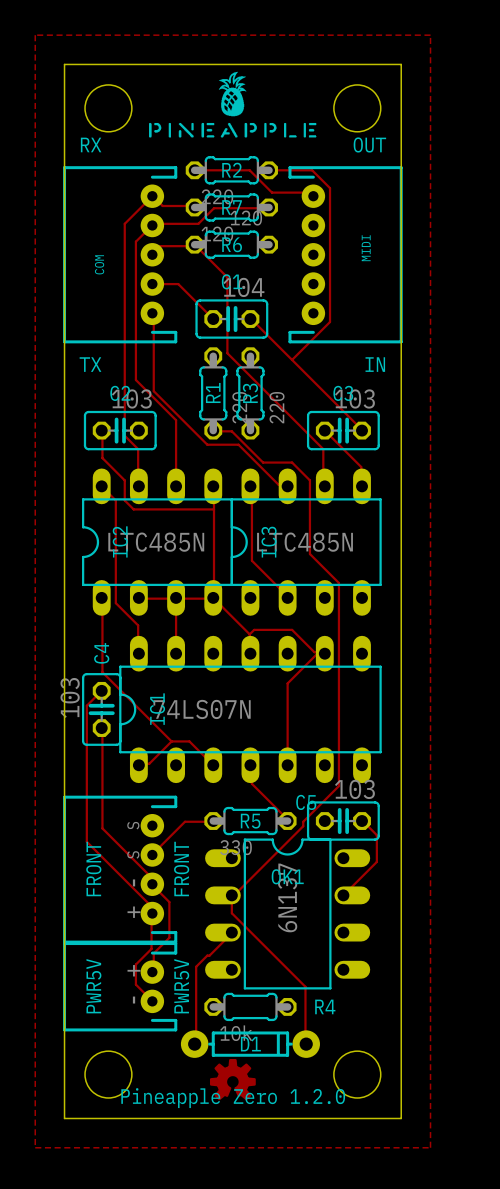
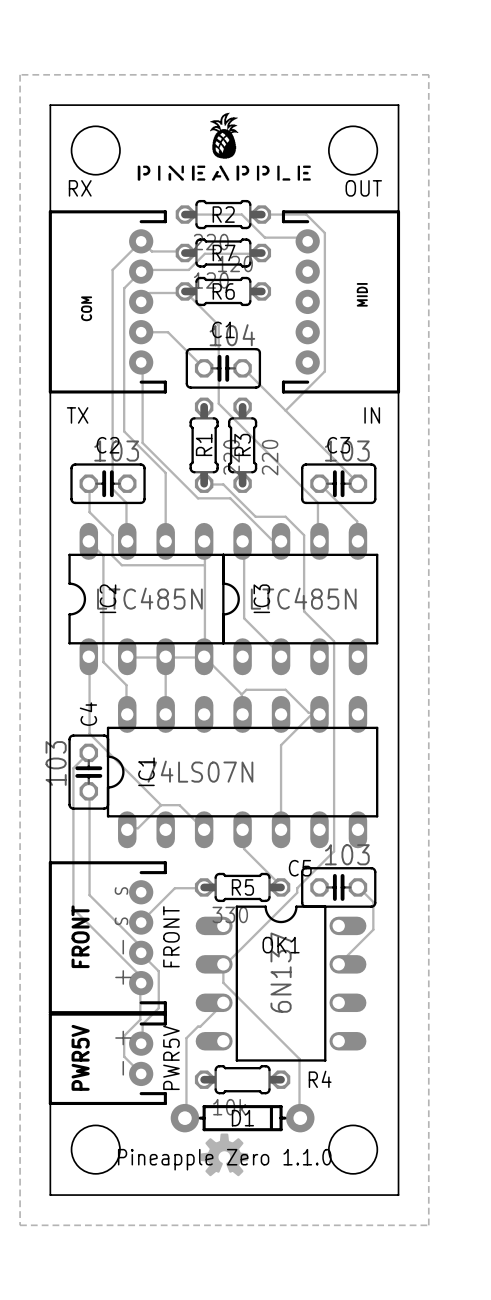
text: Pineapple Zero 1.2.0 (233, 1098) -> Pineapple Zero 1.1.0 (224, 1159)

